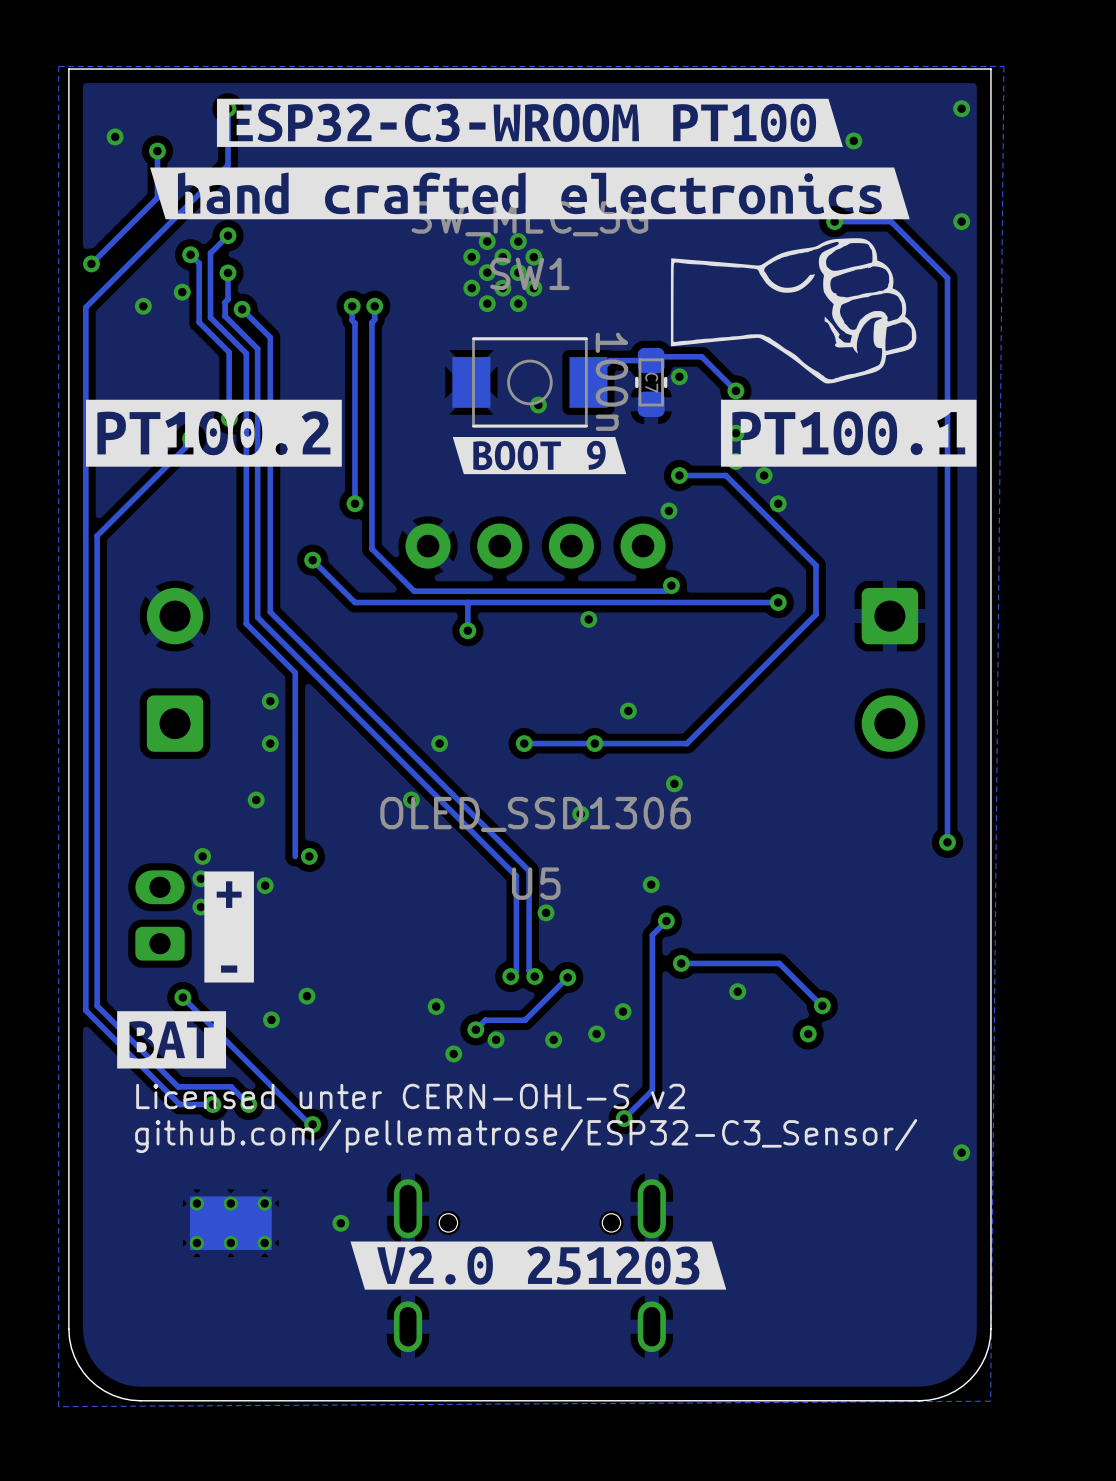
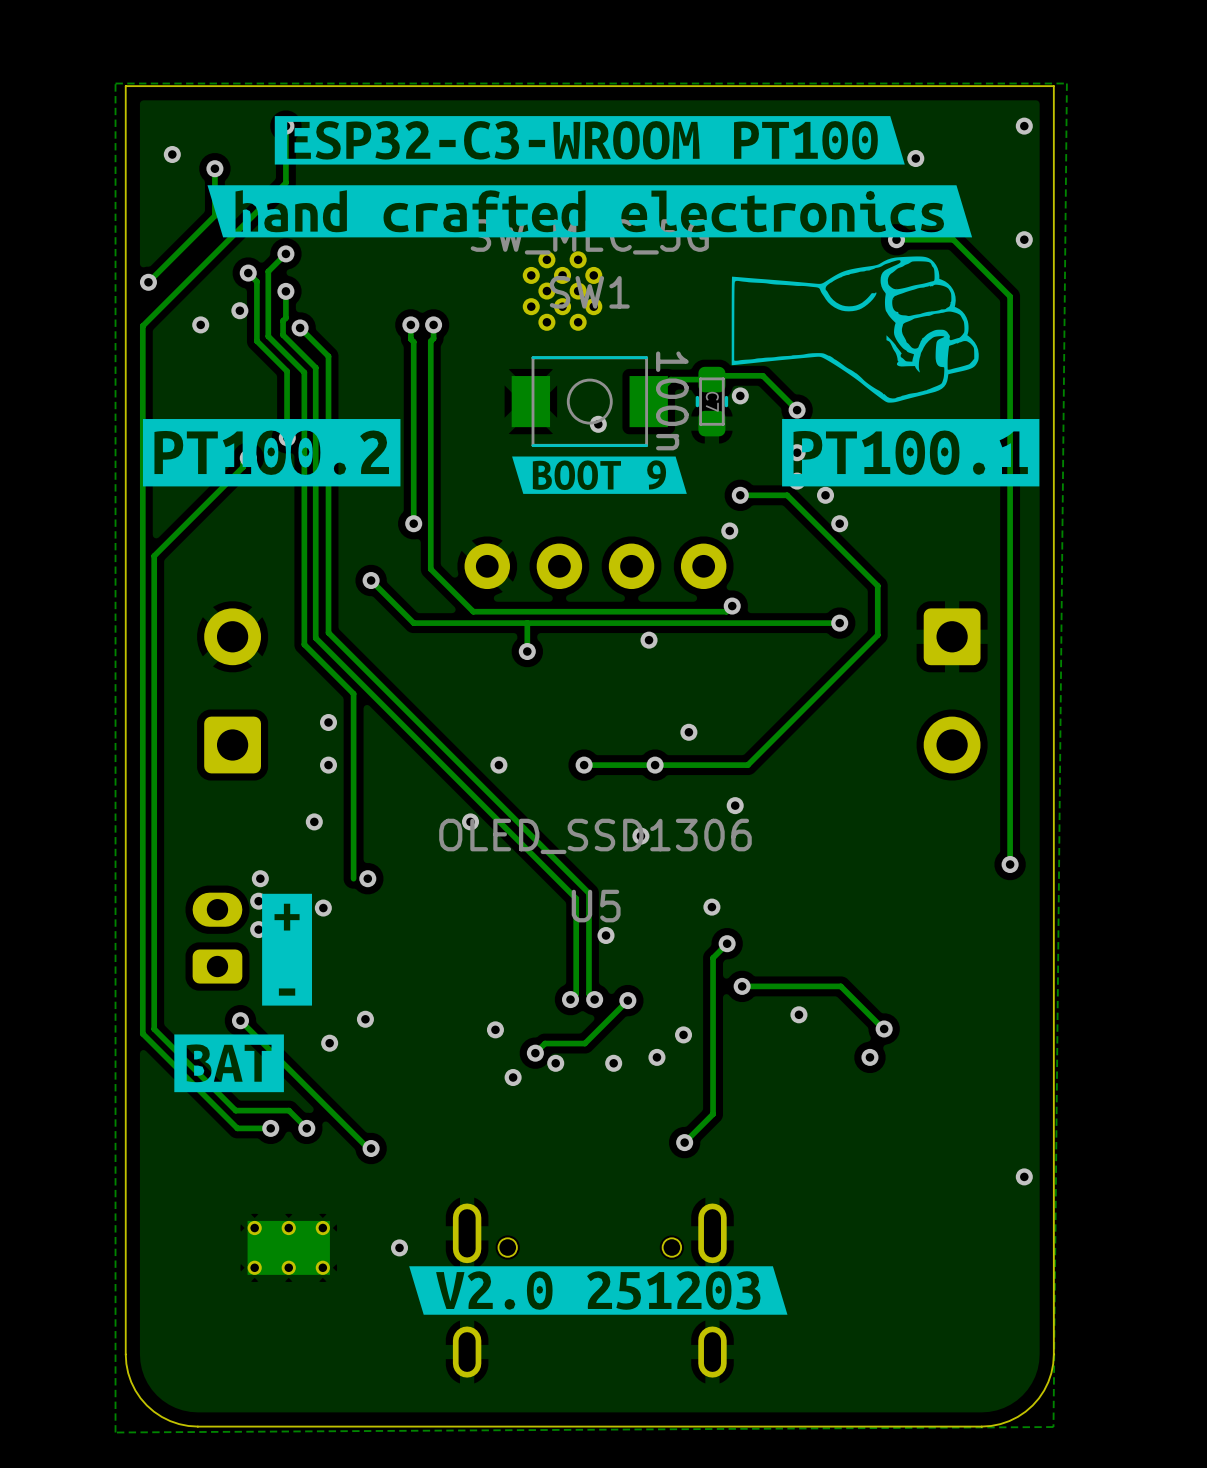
text: Licensed unter CERN-OHL-S v2 (410, 1096) -> none
text: github.com/pellematrose/ESP32-C3_Sensor/ (526, 1136) -> none

